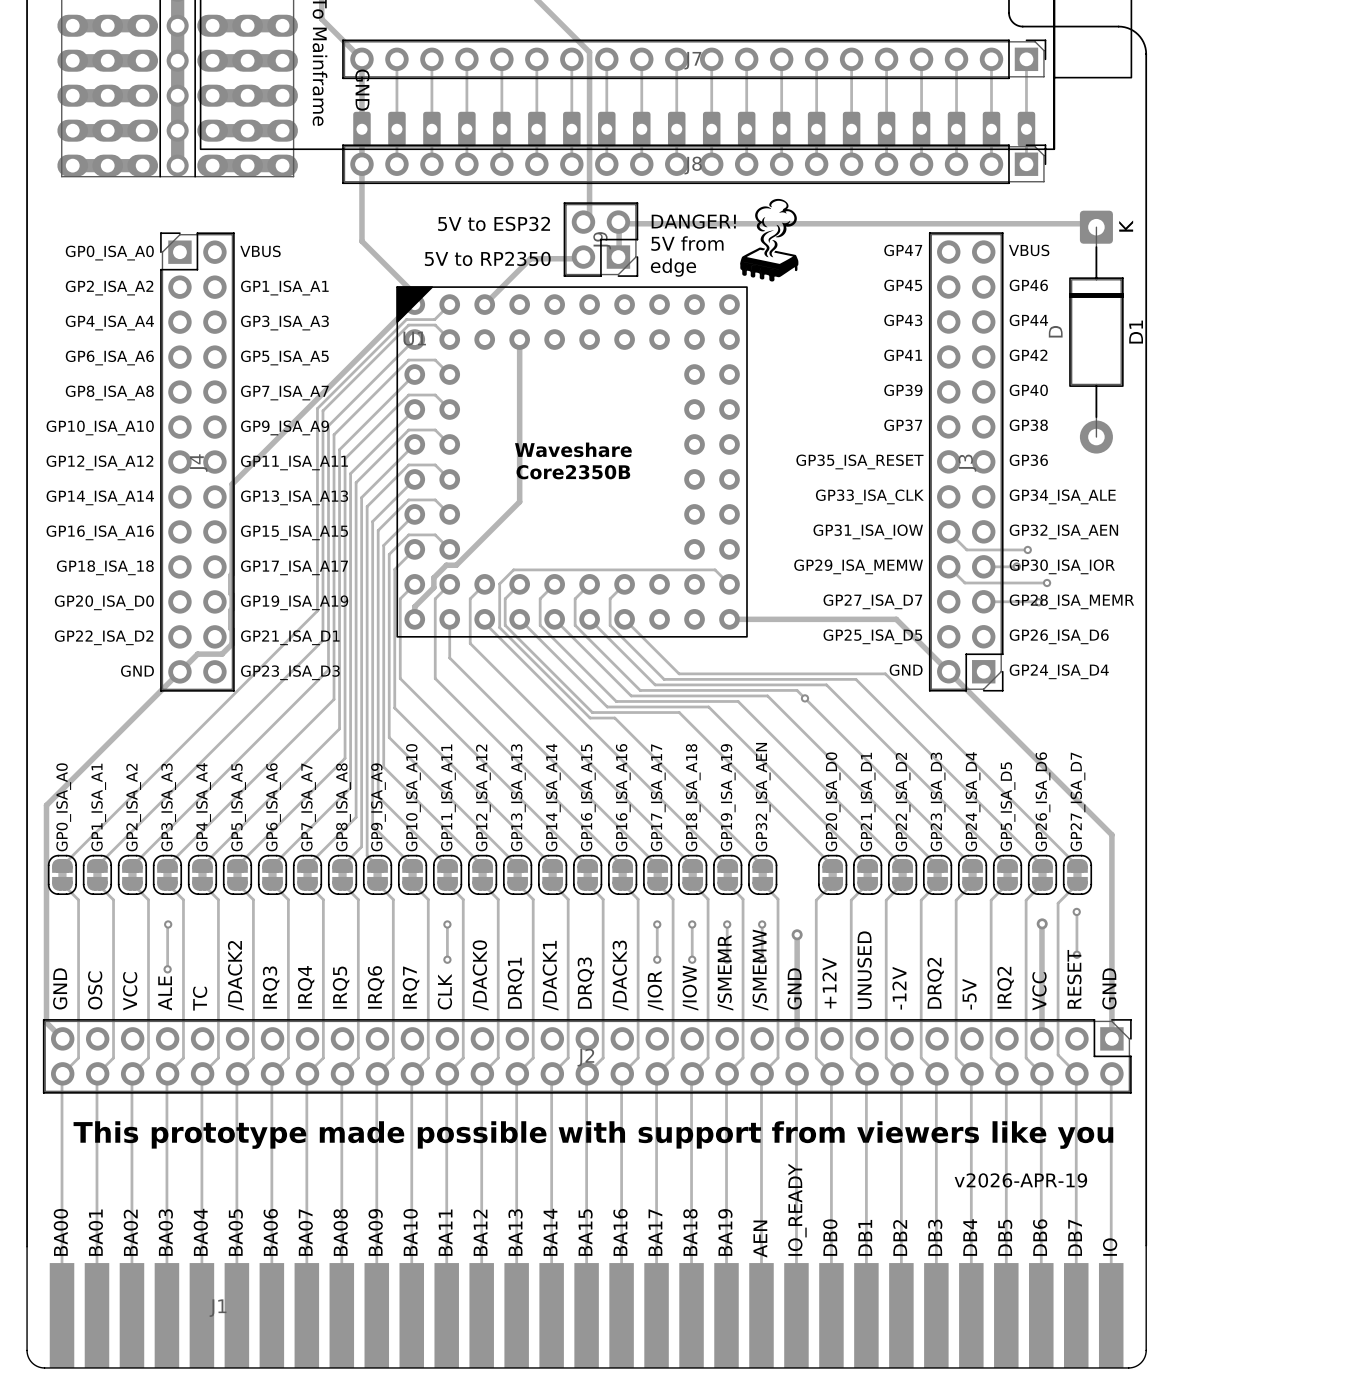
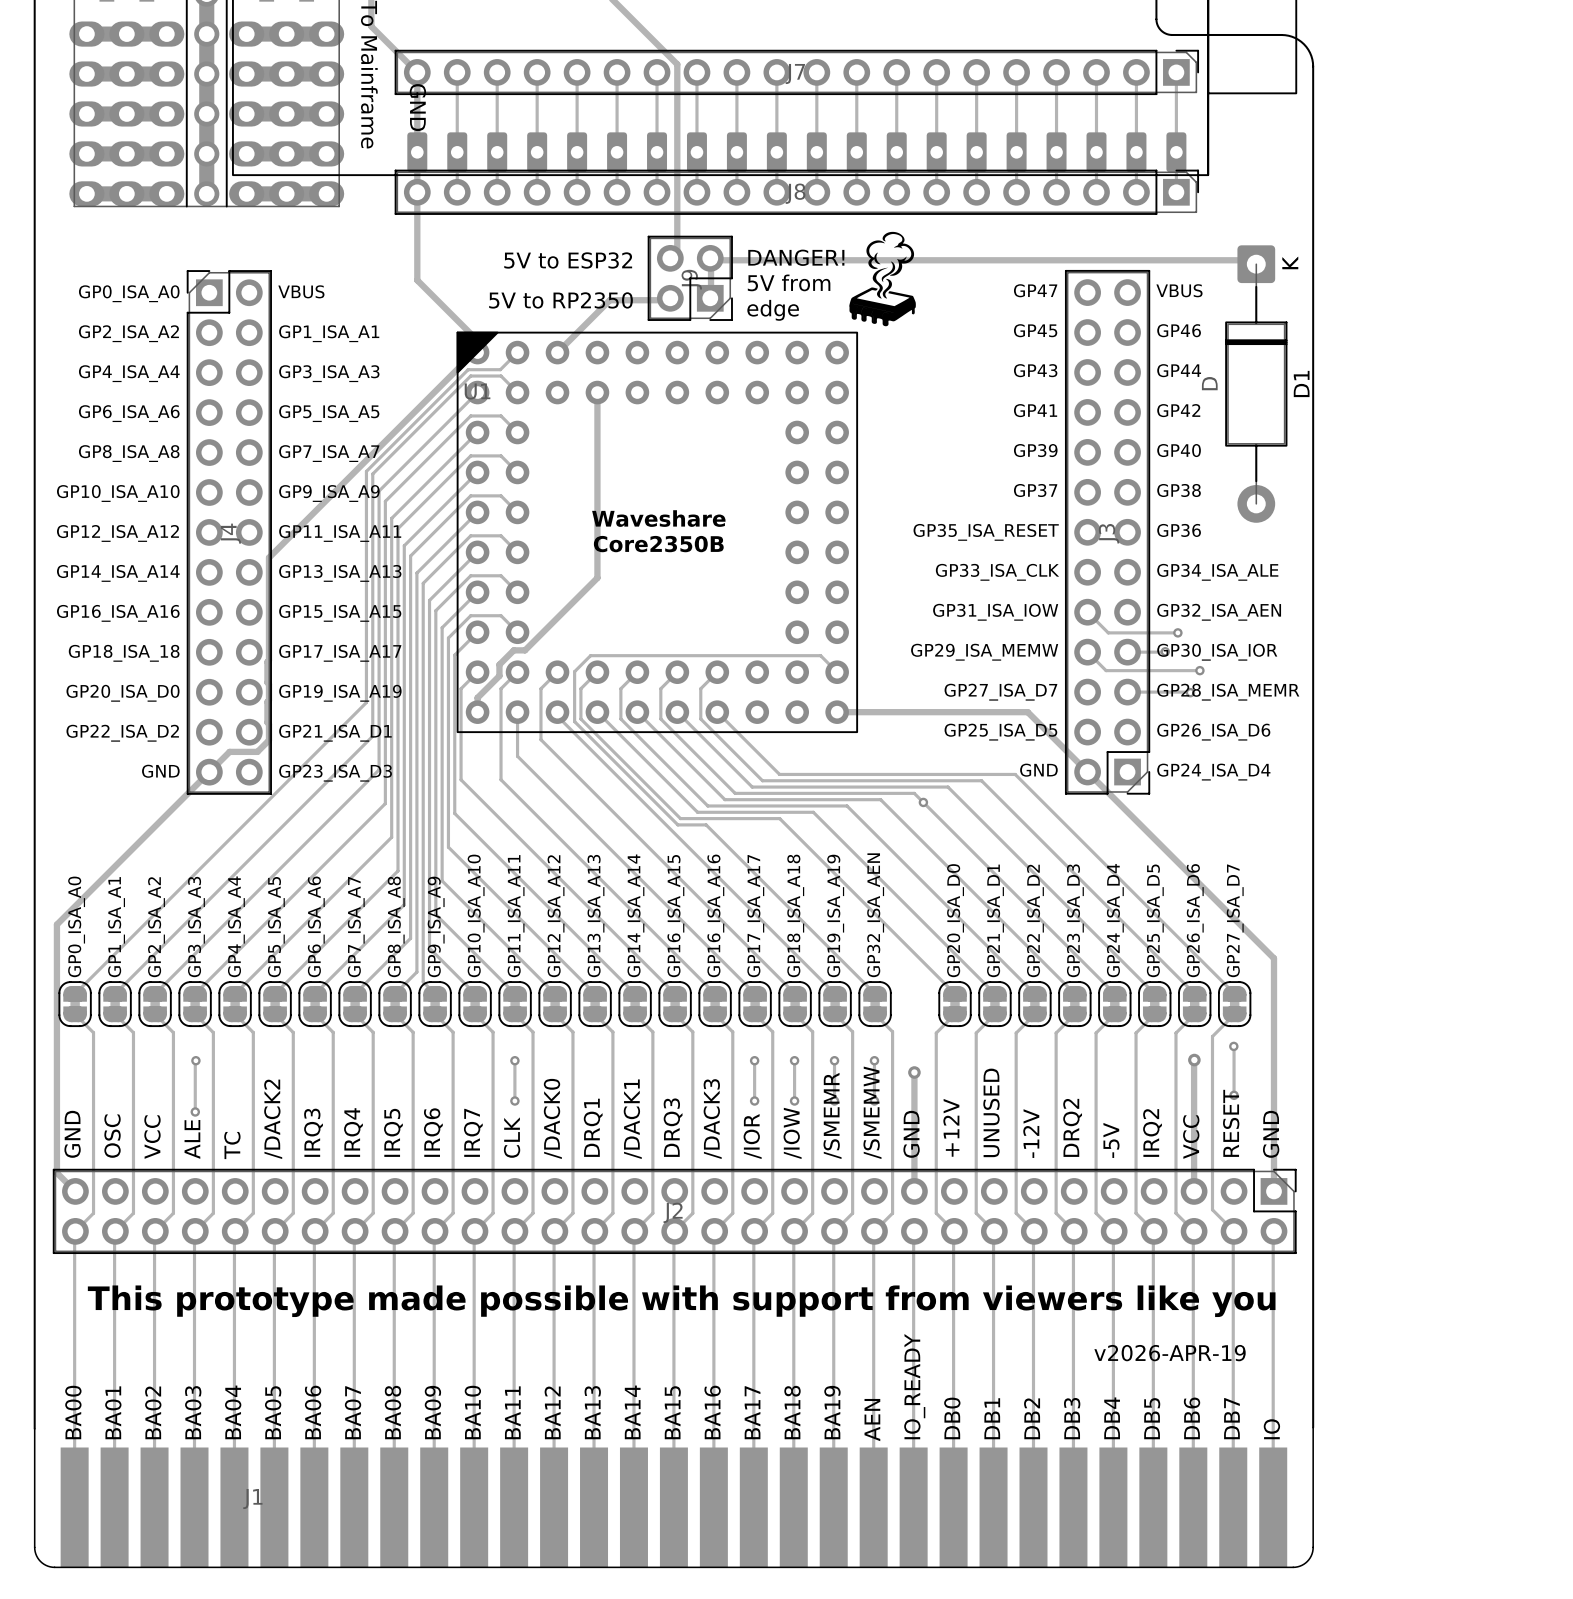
text: GP5_ISA_D5 (1008, 806) -> GP25_ISA_D5 (1155, 920)

